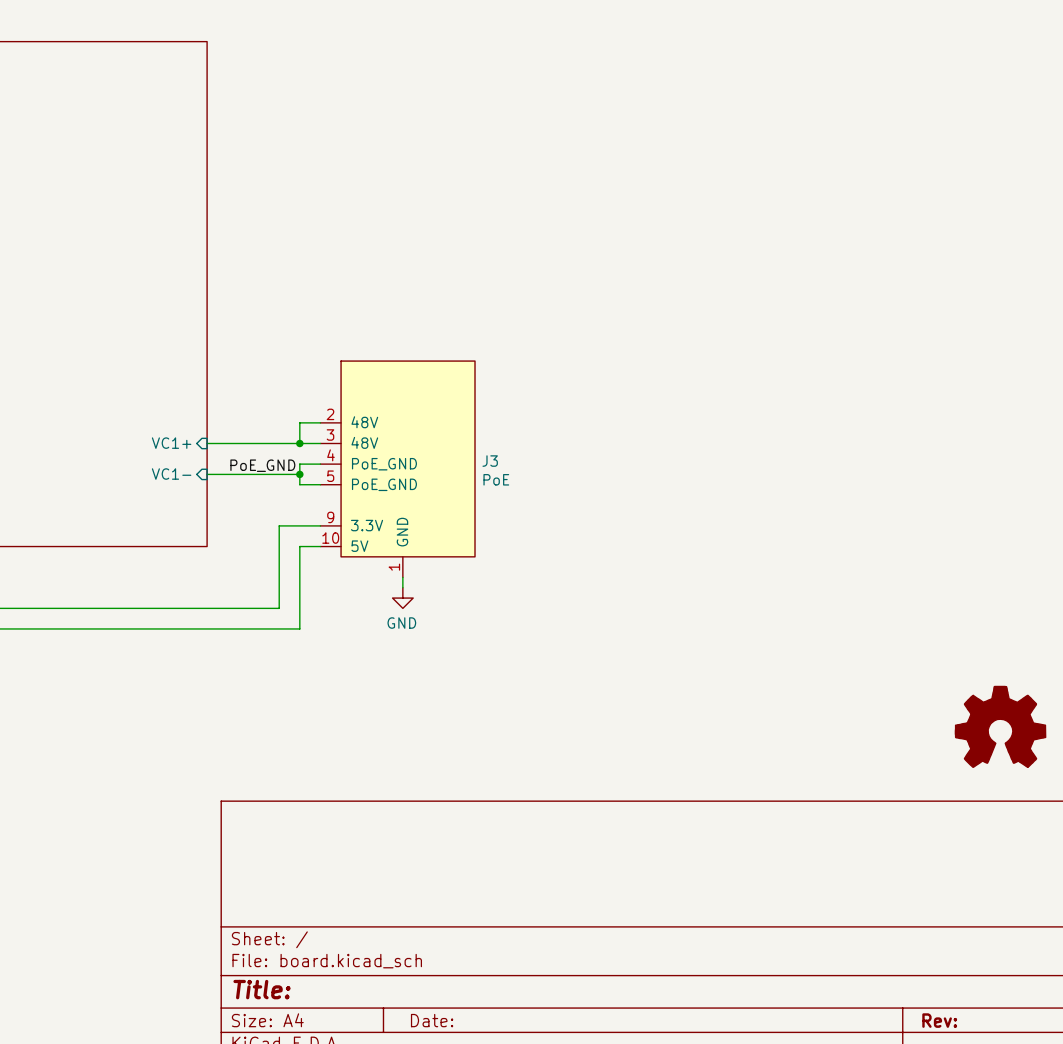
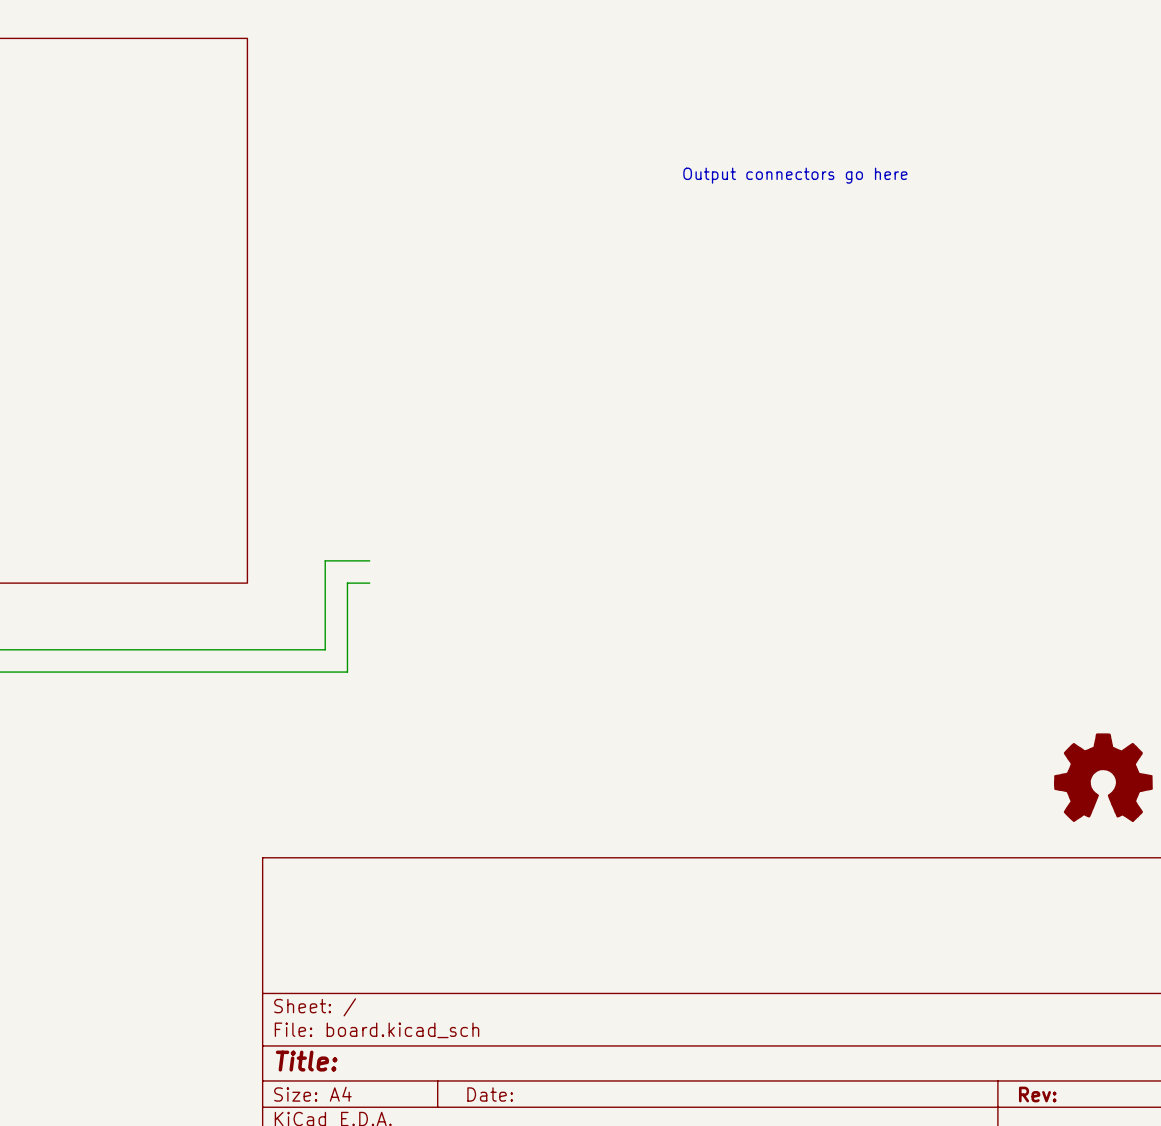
text: none -> Output connectors go here (795, 175)
wire: (320, 422) (299, 422) (299, 443) -> none
sheet pin: VC1+ (171, 443) -> none
wire: (207, 443) (320, 443) -> none
junction: (299, 443) -> none
wire: (320, 464) (299, 464) (299, 484) (320, 484) -> none
label: PoE_GND (262, 465) -> none
J3: PoE (397, 469) -> none
sheet pin: VC1- (171, 474) -> none
wire: (207, 474) (299, 474) -> none
junction: (299, 474) -> none
wire: (402, 577) (402, 587) -> none
power symbol: GND (402, 598) -> none

